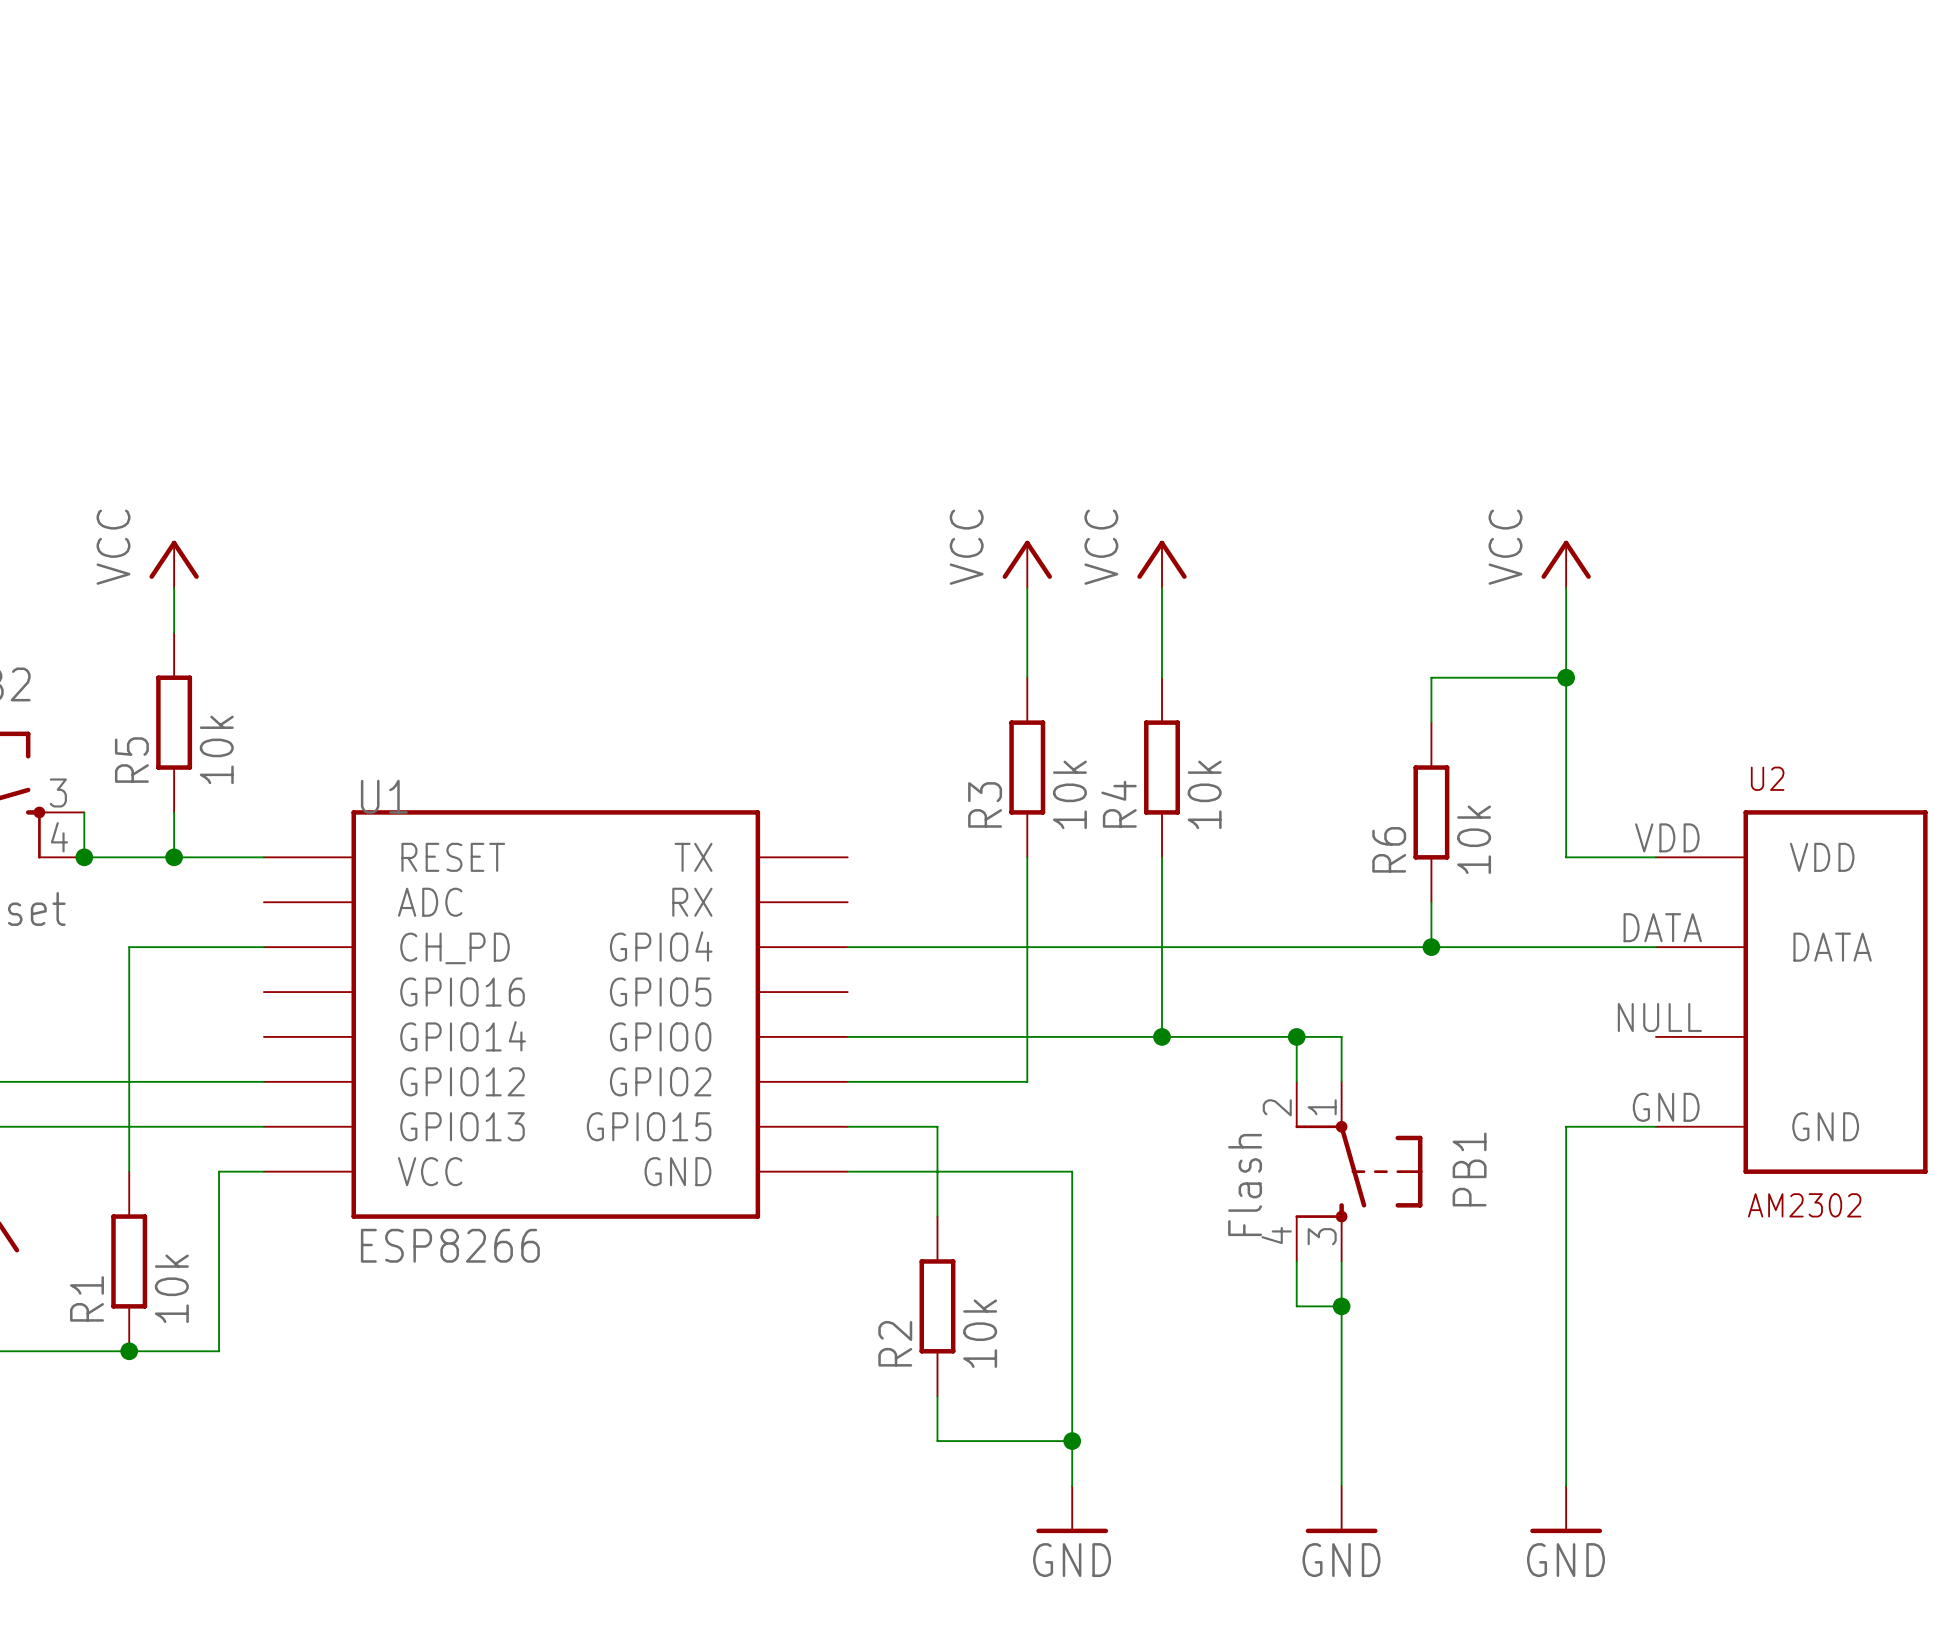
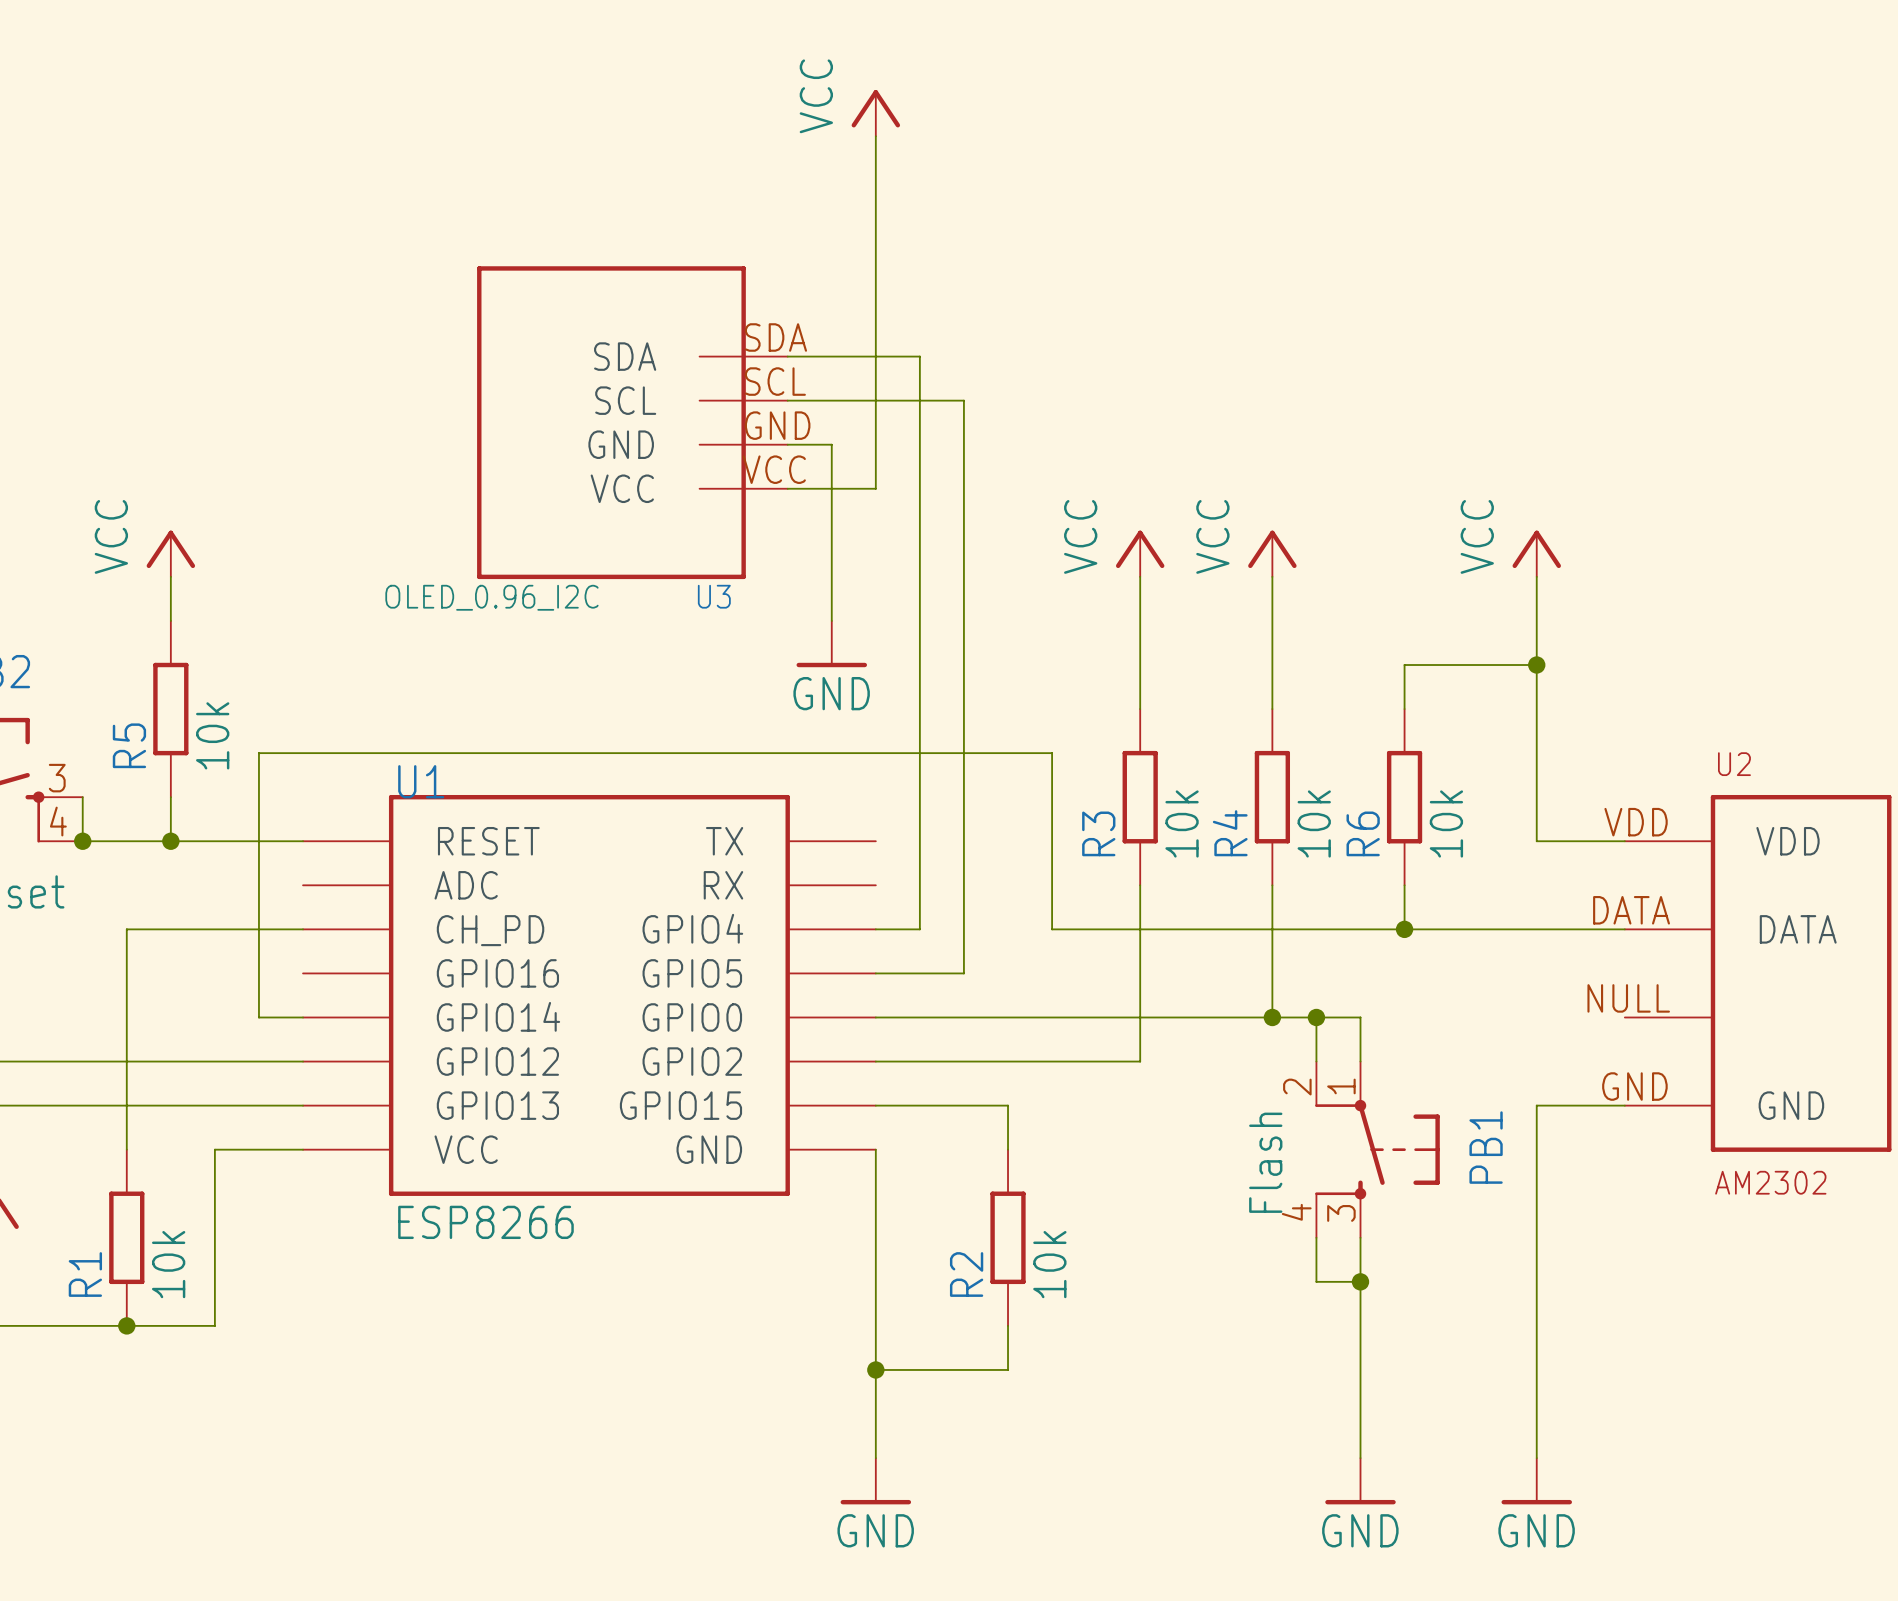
power symbol: none -> VCC (875, 113)
wire: none -> (875, 136) (875, 488) (787, 488)
wire: none -> (787, 356) (919, 356) (919, 929)
wire: none -> (787, 400) (963, 400) (963, 973) (875, 973)
U3: none -> OLED_0.96_I2C (632, 422)
wire: none -> (787, 444) (831, 444) (831, 620)
power symbol: VCC (1027, 564) -> none
power symbol: none -> VCC (1272, 553)
wire: (1027, 587) (1027, 677) -> none
wire: none -> (1272, 576) (1272, 709)
power symbol: none -> GND (831, 644)
R3 position: (1027, 767) -> (1140, 797)
R4 position: (1162, 767) -> (1272, 797)
wire: (1027, 857) (1027, 1081) -> (1140, 1017) (1140, 1061) (1008, 1061)
wire: (937, 947) (1072, 947) -> (303, 1017) (258, 1017) (258, 753) (1052, 753) (1052, 929)
U1 position: (555, 1014) -> (589, 995)
junction: (1162, 1036) -> none
wire: (1296, 1036) (1296, 1081) -> (1272, 1017) (1272, 885)
wire: none -> (1316, 1017) (1360, 1017) (1360, 1061)
junction: none -> (1316, 1017)
wire: (937, 1126) (937, 1216) -> (919, 1105) (1008, 1105) (1008, 1149)
wire: (847, 1171) (1072, 1171) (1072, 1485) -> none
wire: none -> (875, 1149) (875, 1458)
PB1 position: (1358, 1171) -> (1377, 1149)
wire: (1296, 1261) (1296, 1306) (1341, 1306) (1341, 1485) -> none
wire: none -> (1360, 1237) (1360, 1458)
R2 position: (937, 1306) -> (1008, 1237)
wire: none -> (1316, 1281) (1360, 1281)
junction position: (1341, 1306) -> (1360, 1281)
wire: none -> (1008, 1325) (1008, 1369) (875, 1369)
junction: none -> (875, 1369)
wire: (937, 1396) (937, 1441) (1072, 1441) -> none
junction: (1072, 1441) -> none
power symbol: none -> GND (875, 1481)
power symbol: GND (1072, 1509) -> none
power symbol position: GND (1341, 1509) -> GND (1360, 1481)

